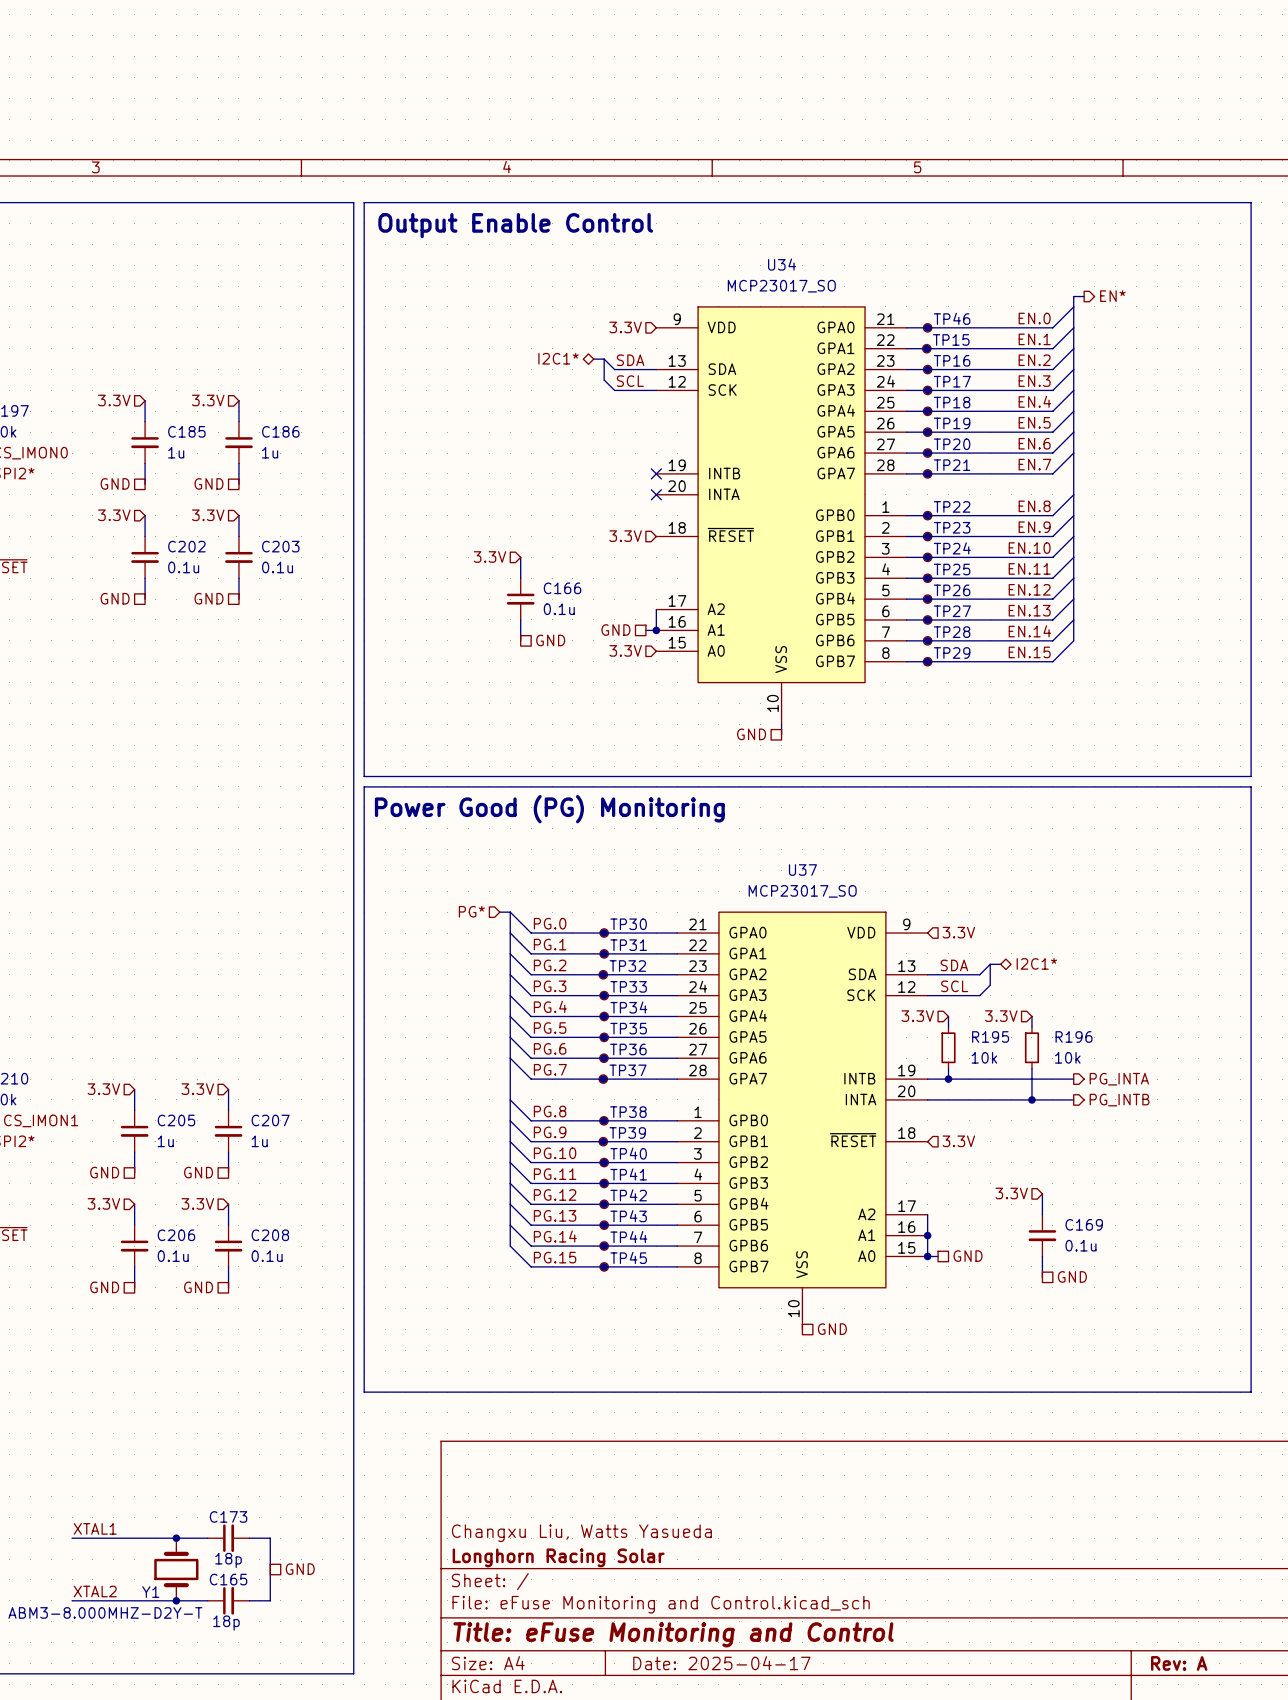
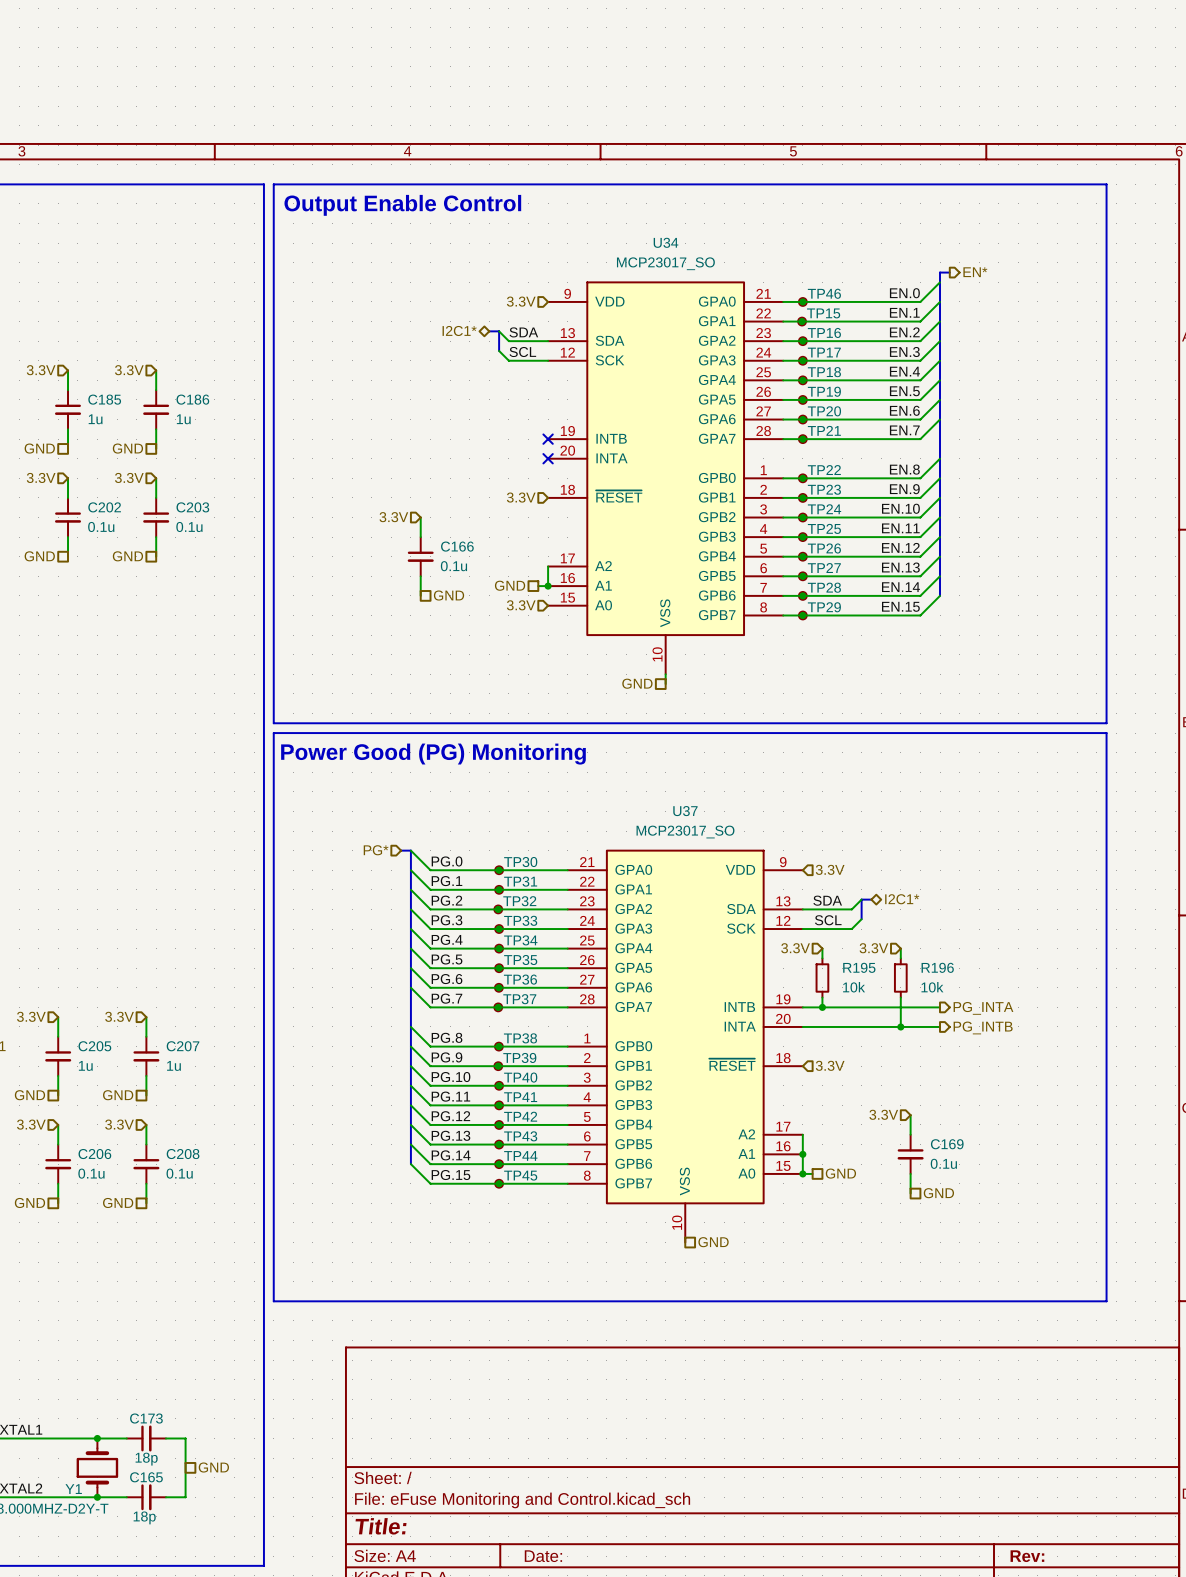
title block: Changxu Liu, Watts Yasueda (581, 1533) -> none
title block: Longhorn Racing Solar (558, 1557) -> none
title block: Title: eFuse Monitoring and Control (673, 1634) -> Title: (381, 1526)
title block: Date: 2025-04-17 (721, 1663) -> Date: (543, 1556)
title block: Rev: A (1179, 1663) -> Rev: (1027, 1556)

